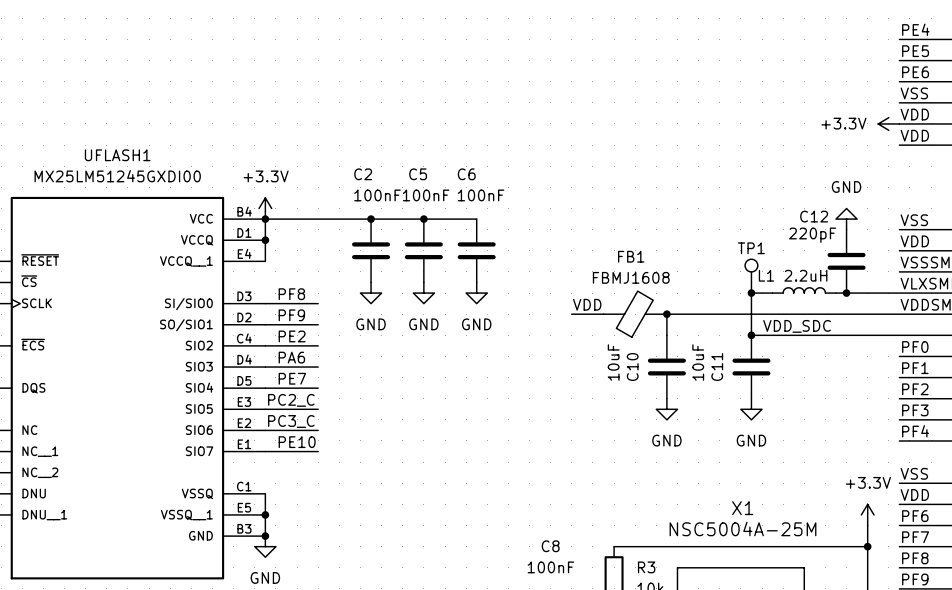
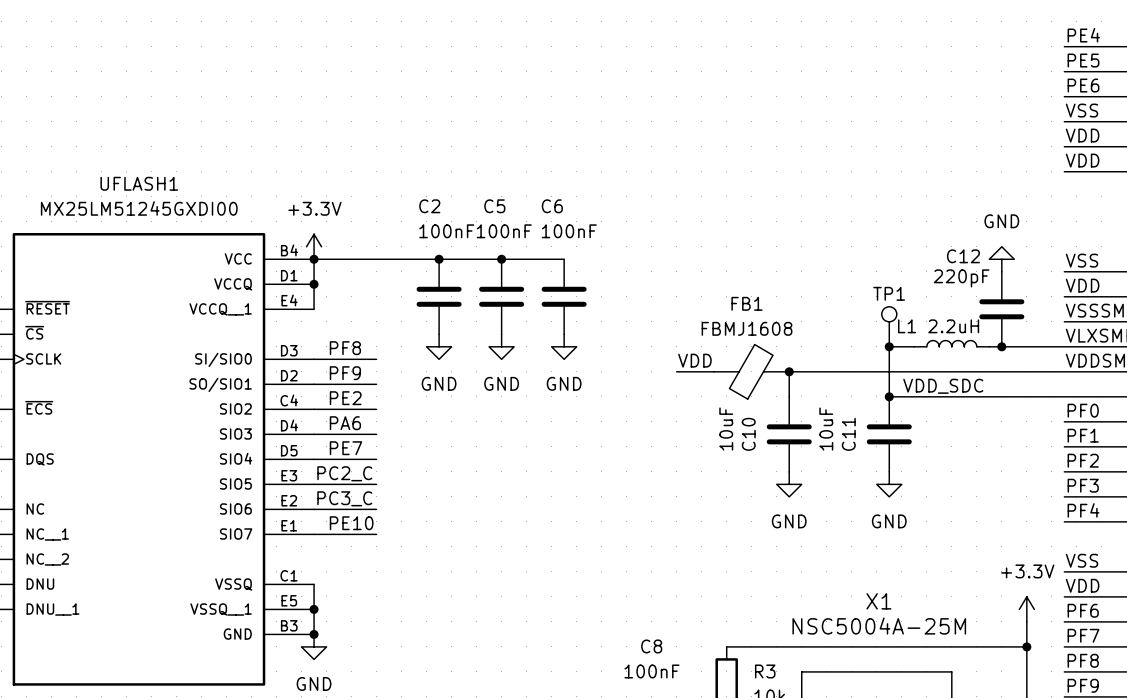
power symbol: +3.3V (888, 123) -> none

